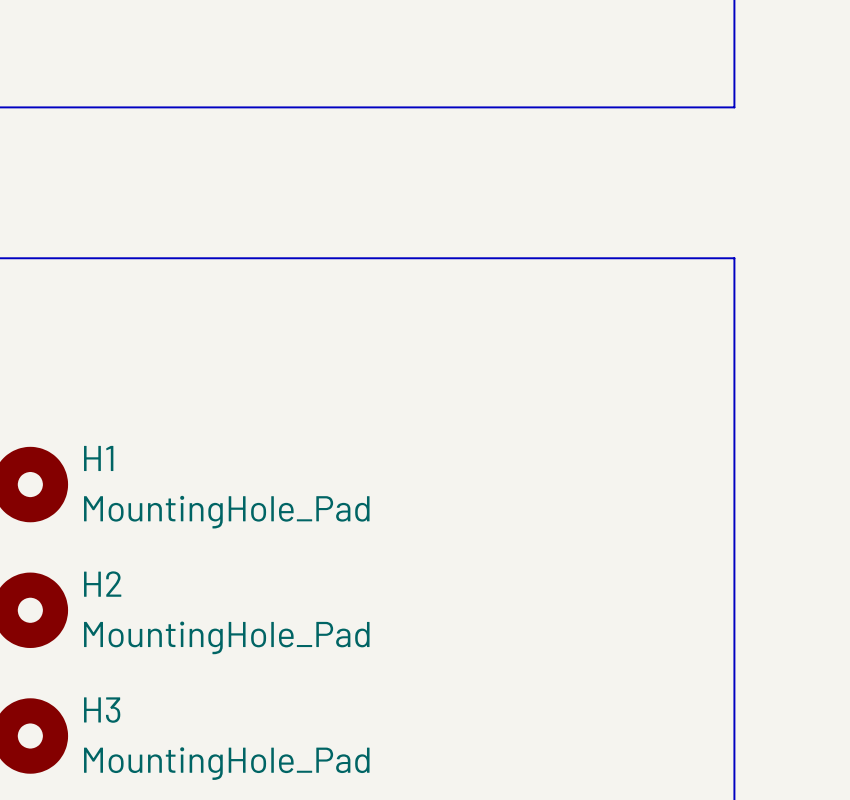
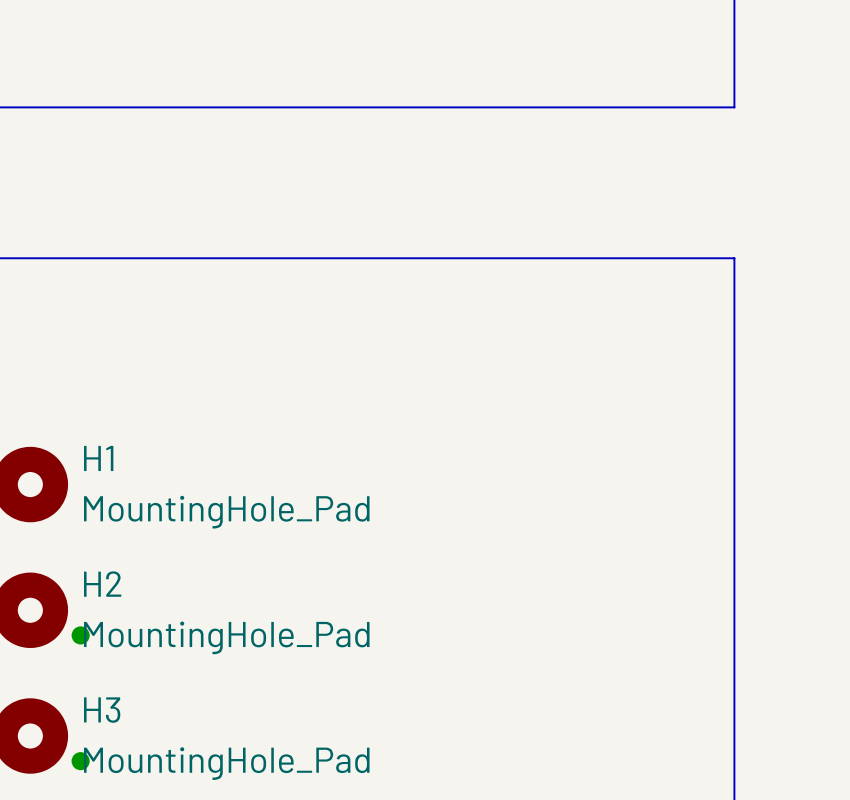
junction: none -> (80, 635)
junction: none -> (80, 761)

